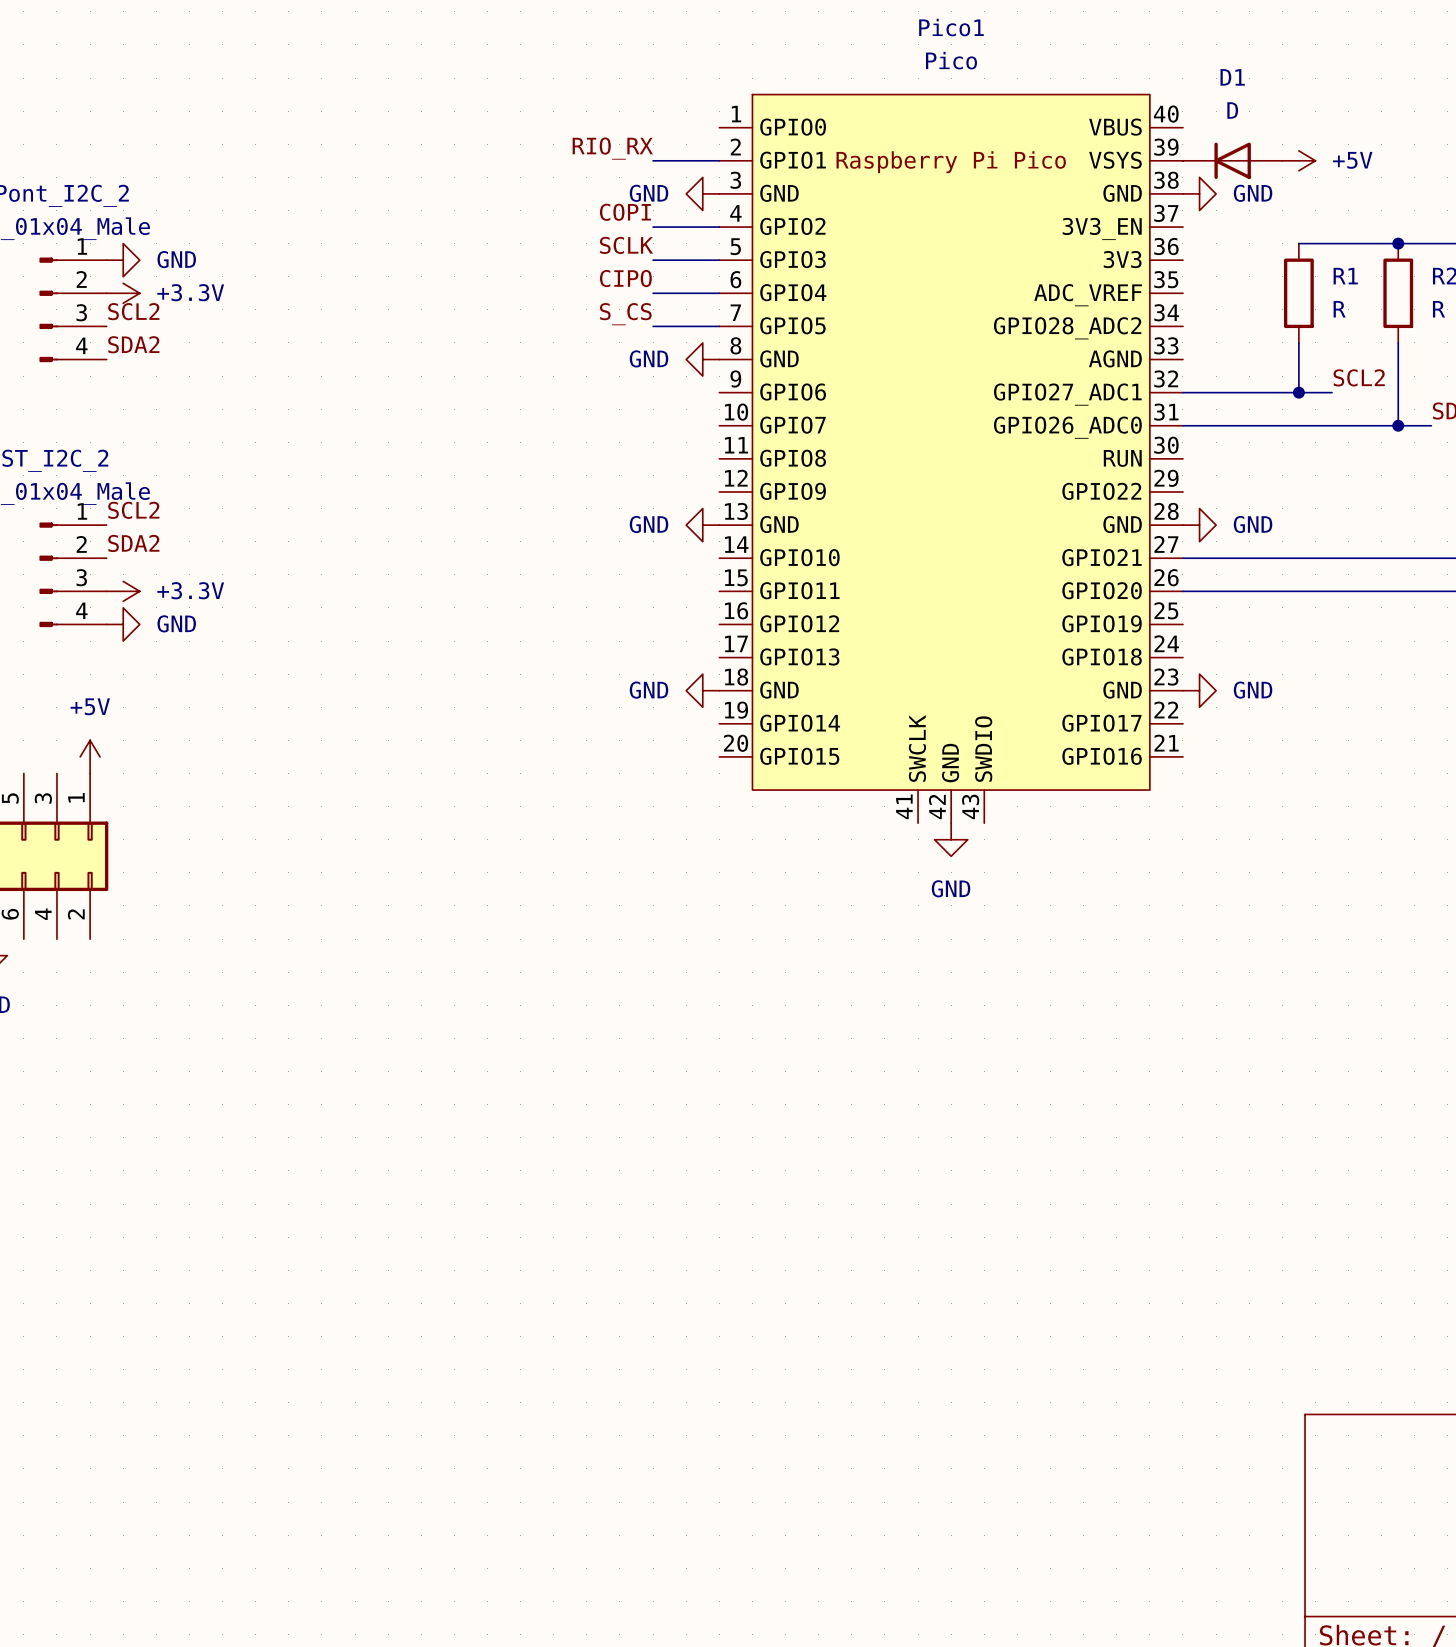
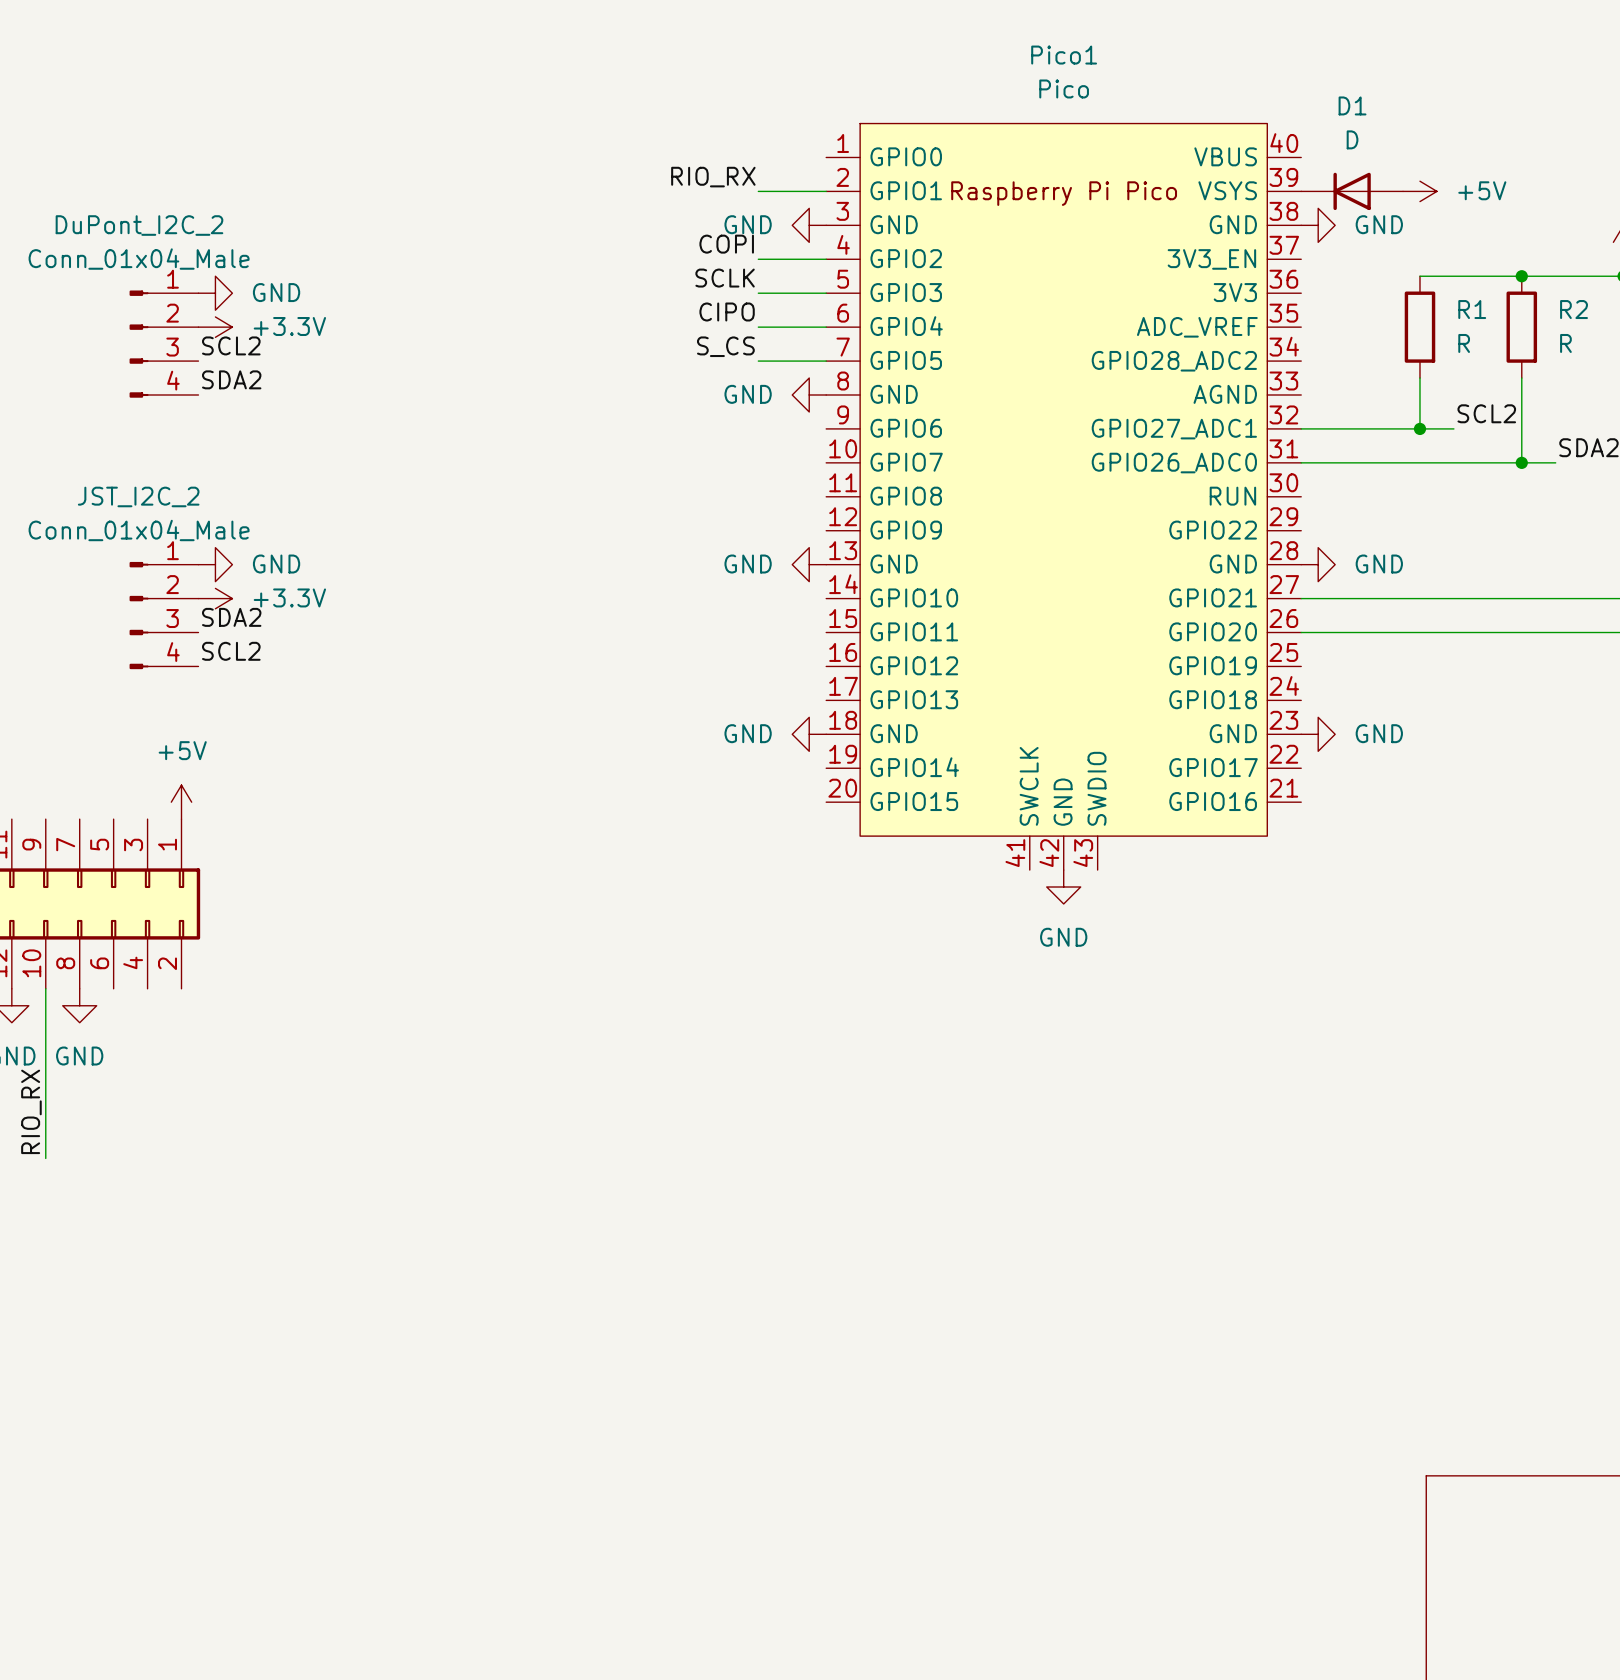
label position: SCL2 (133, 510) -> SCL2 (231, 651)
label position: SDA2 (133, 543) -> SDA2 (231, 617)
power symbol position: +3.3V (123, 591) -> +3.3V (215, 598)
power symbol position: GND (123, 624) -> GND (215, 564)

